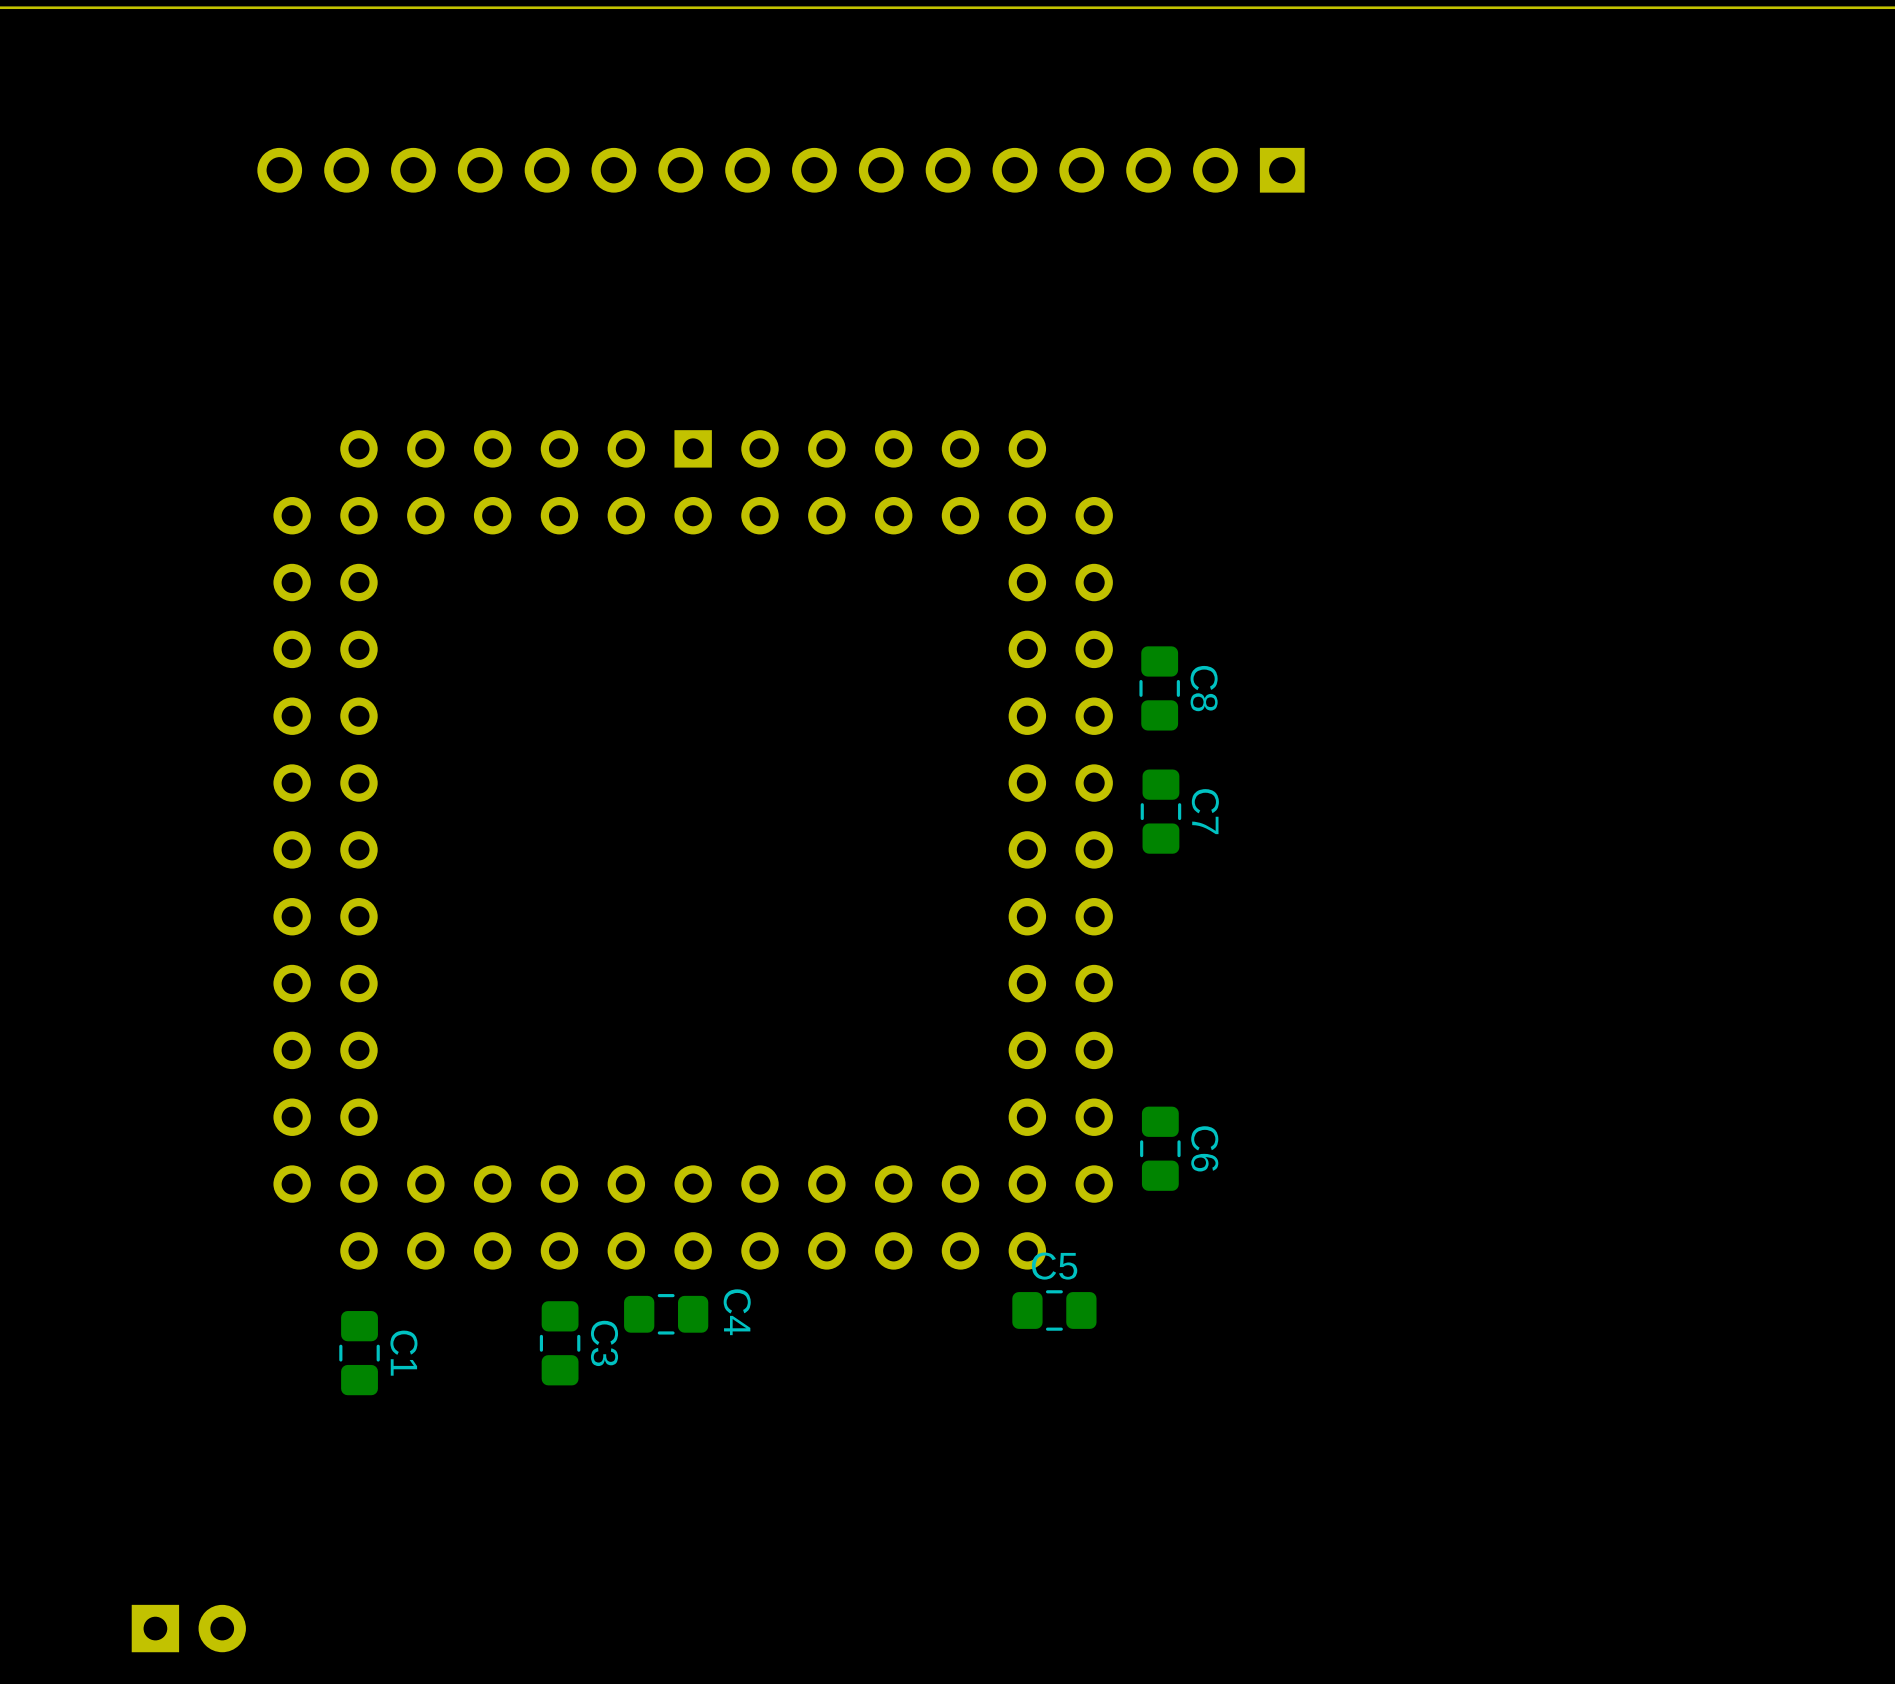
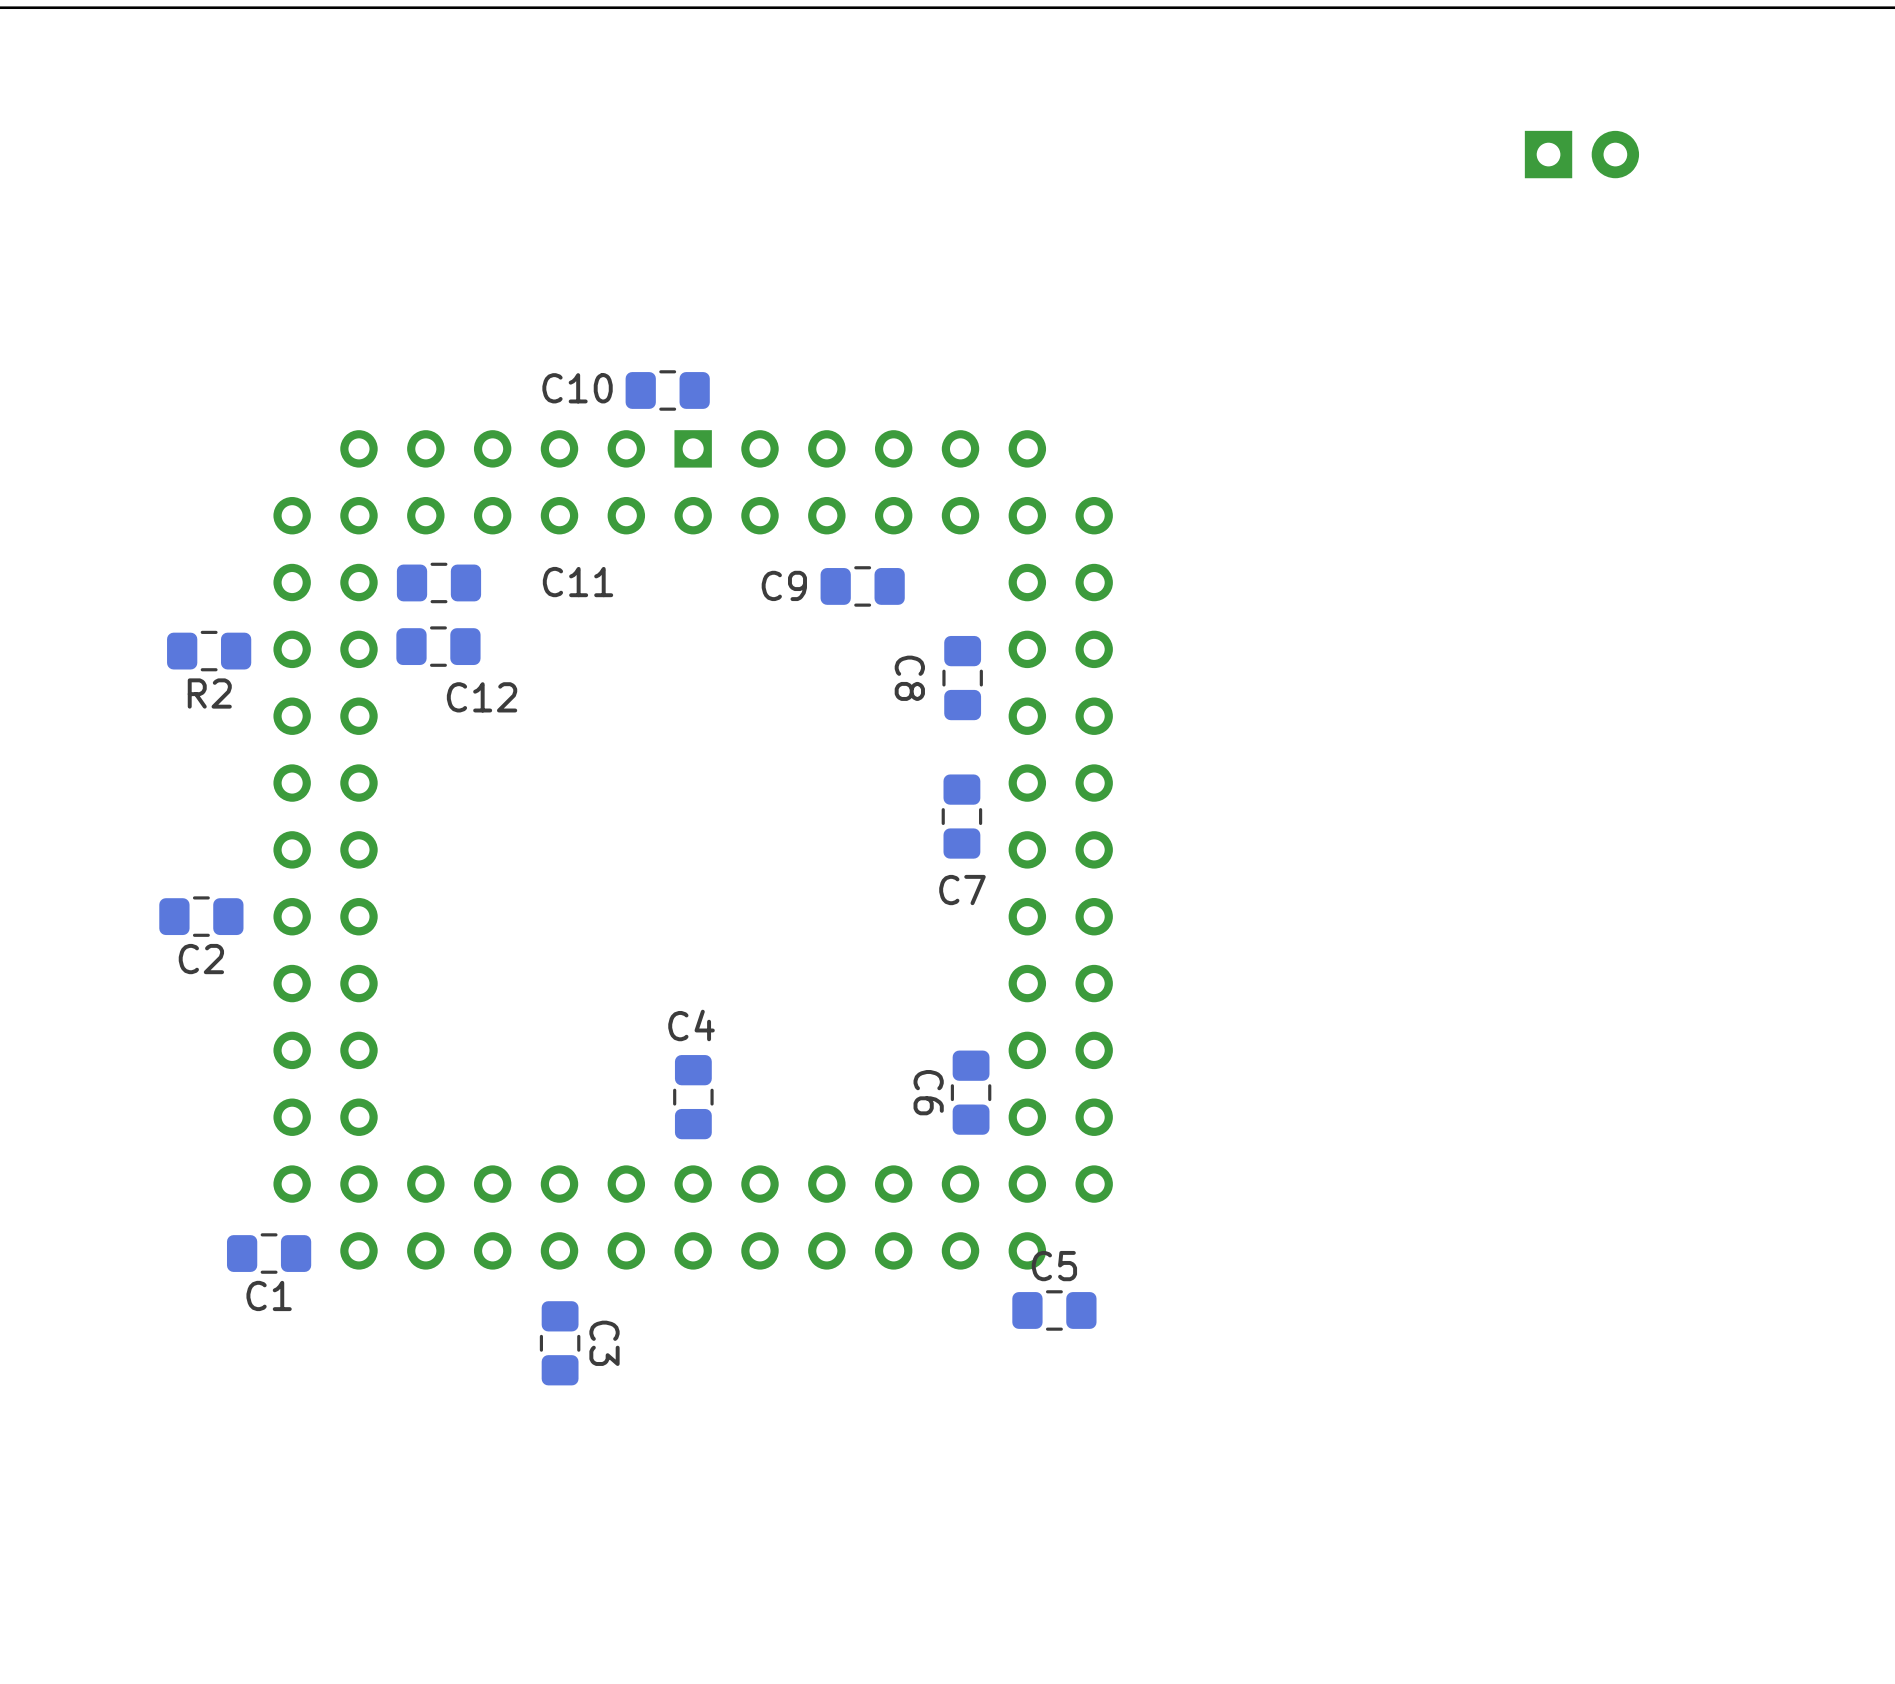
part: none -> (1581, 154)
part: (780, 170) -> none
C10: none -> (667, 390)
C11: none -> (438, 582)
C9: none -> (862, 586)
C12: none -> (438, 646)
R2: none -> (209, 651)
C8 position: (1159, 688) -> (962, 678)
C8 name position: C8 (1204, 688) -> C8 (909, 678)
C7 position: (1160, 811) -> (961, 816)
C7 name rotation: 0° (1205, 811) -> 90° counterclockwise (962, 890)
C7 name position: C7 (1205, 811) -> C7 (962, 890)
C2: none -> (201, 916)
C6 position: (1160, 1148) -> (971, 1092)
C6 name position: C6 (1204, 1148) -> C6 (928, 1092)
C4 name position: C4 (737, 1312) -> C4 (691, 1025)
C4 rotation: 0° (666, 1314) -> 90° clockwise (693, 1097)
C4 position: (666, 1314) -> (693, 1097)
C1 rotation: 0° (359, 1353) -> 90° clockwise (269, 1253)
C1 position: (359, 1353) -> (269, 1253)
part: (188, 1628) -> none

